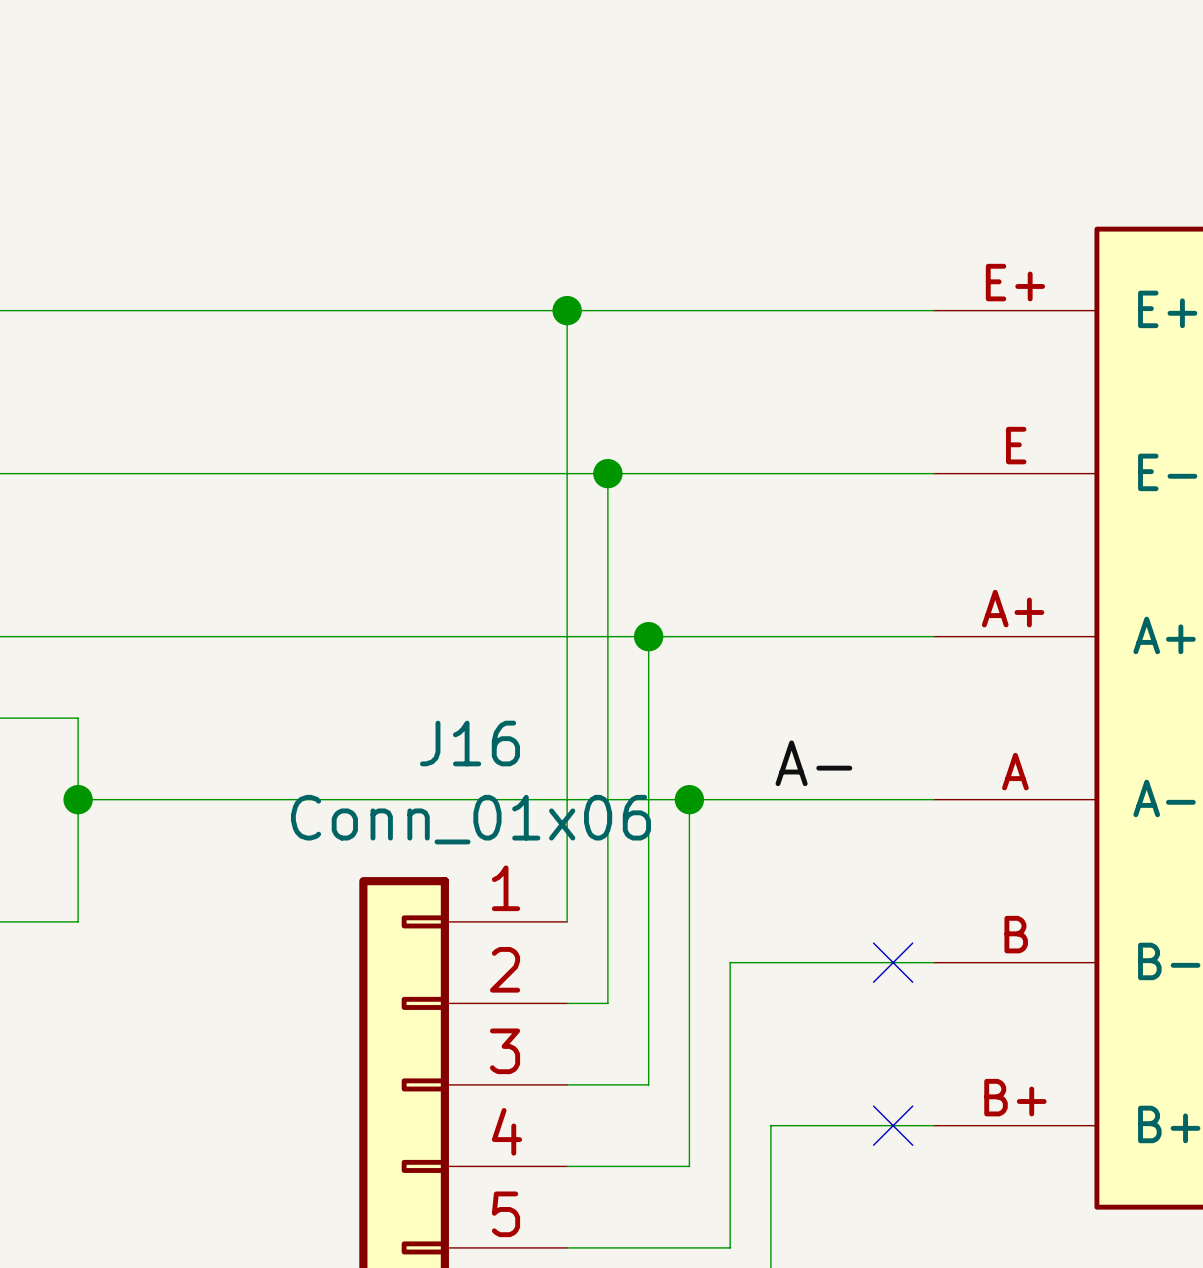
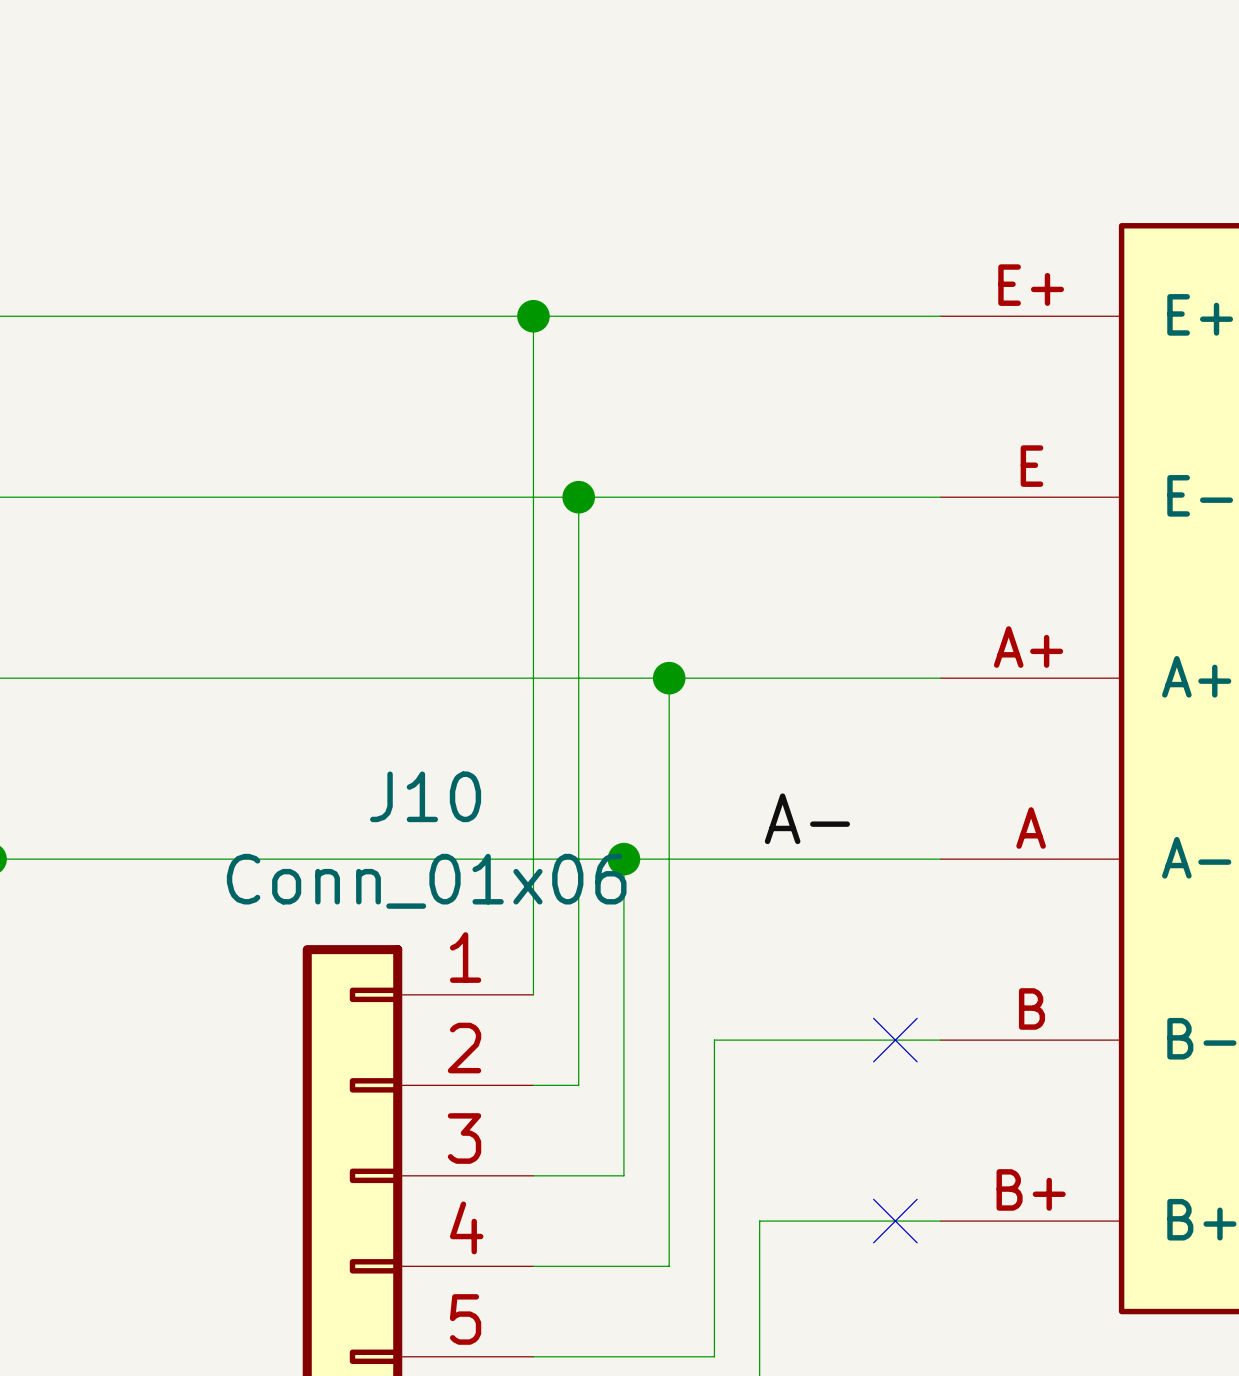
wire: (648, 636) (648, 799) -> (669, 678) (669, 859)
junction position: (648, 636) -> (669, 678)
J16 name: J16 (469, 743) -> J10 (425, 796)
junction position: (689, 799) -> (623, 859)

